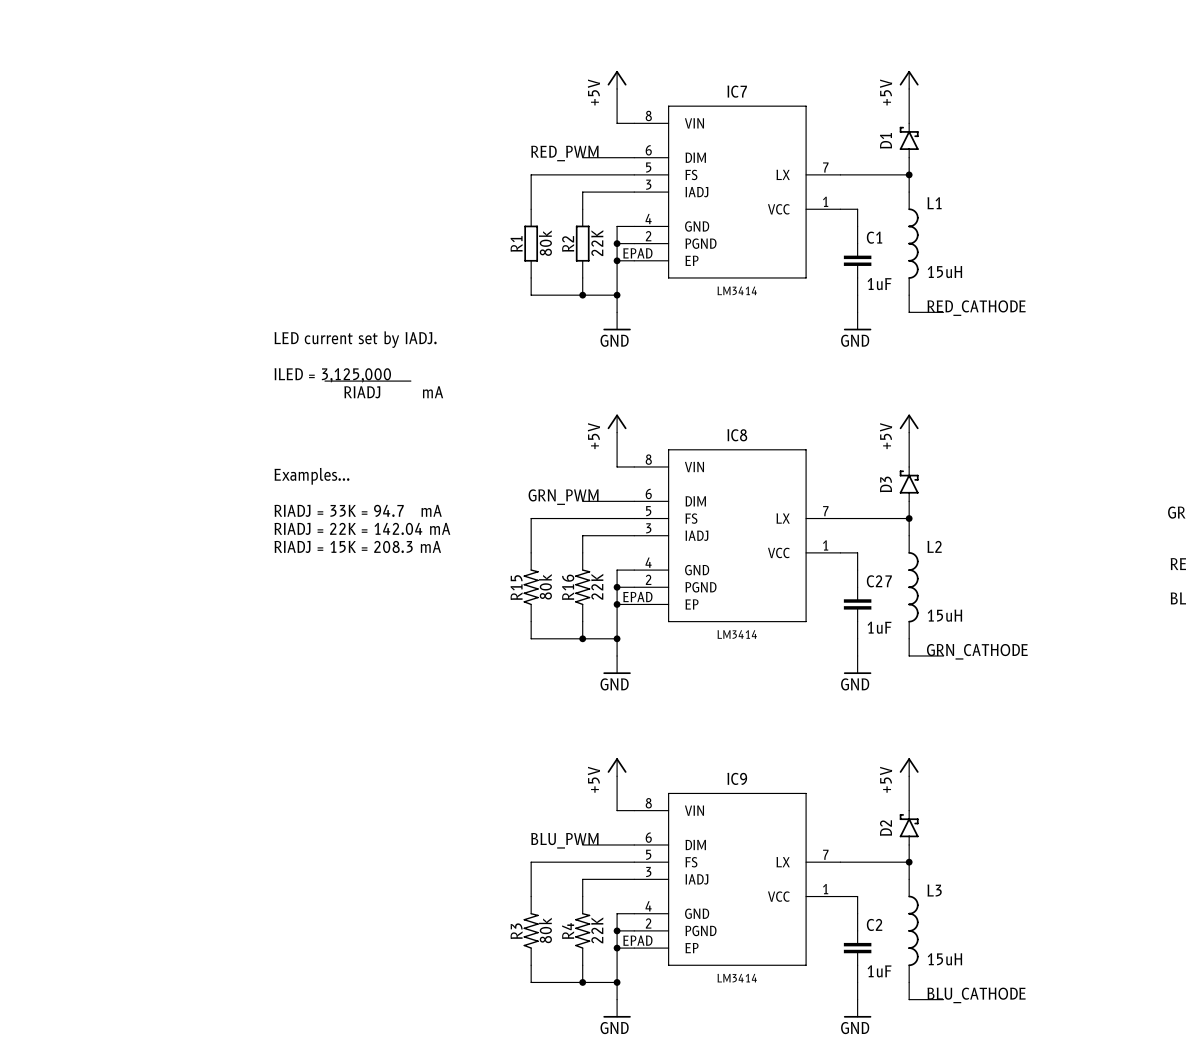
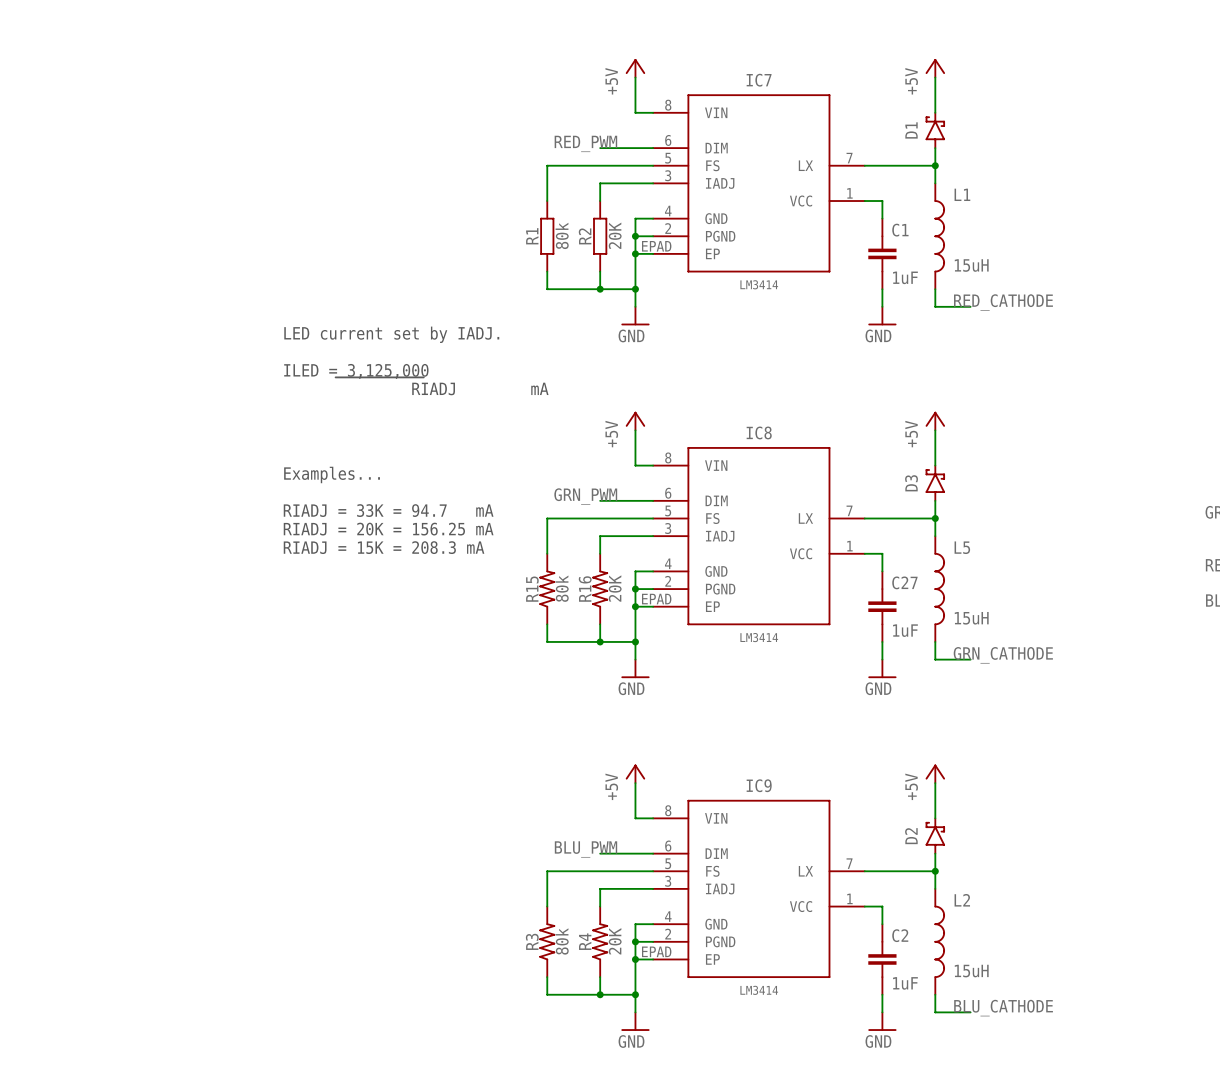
R2 value: 22K (597, 243) -> 20K (615, 235)
text: RIADJ = 22K = 142.04 mA (362, 528) -> RIADJ = 20K = 156.25 mA (388, 529)
L2 name: L2 (934, 546) -> L5 (962, 547)
R16 value: 22K (597, 586) -> 20K (615, 588)
L3 name: L3 (934, 890) -> L2 (962, 900)
R4 value: 22K (597, 930) -> 20K (615, 941)

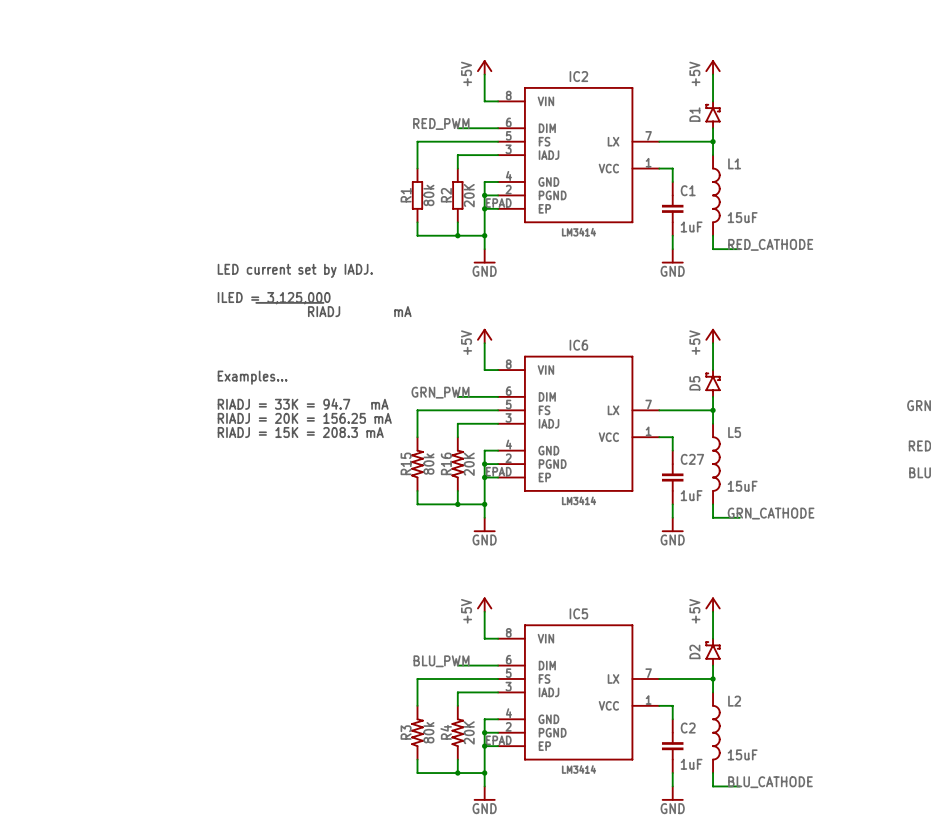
IC7 name: IC7 (759, 80) -> IC2 (578, 76)
L1 value: 15uH (971, 265) -> 15uF (742, 217)
IC8 name: IC8 (759, 432) -> IC6 (578, 345)
D3 name: D3 (911, 483) -> D5 (694, 383)
L5 value: 15uH (971, 618) -> 15uF (742, 486)
IC9 name: IC9 (759, 785) -> IC5 (578, 613)
L2 value: 15uH (971, 971) -> 15uF (742, 754)

